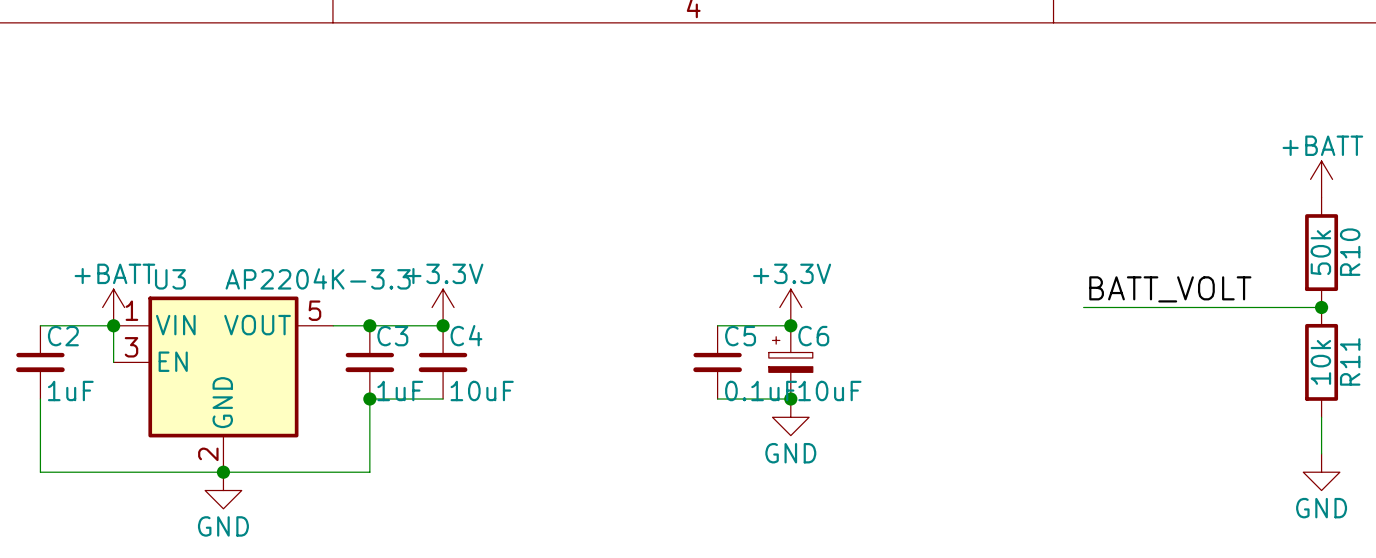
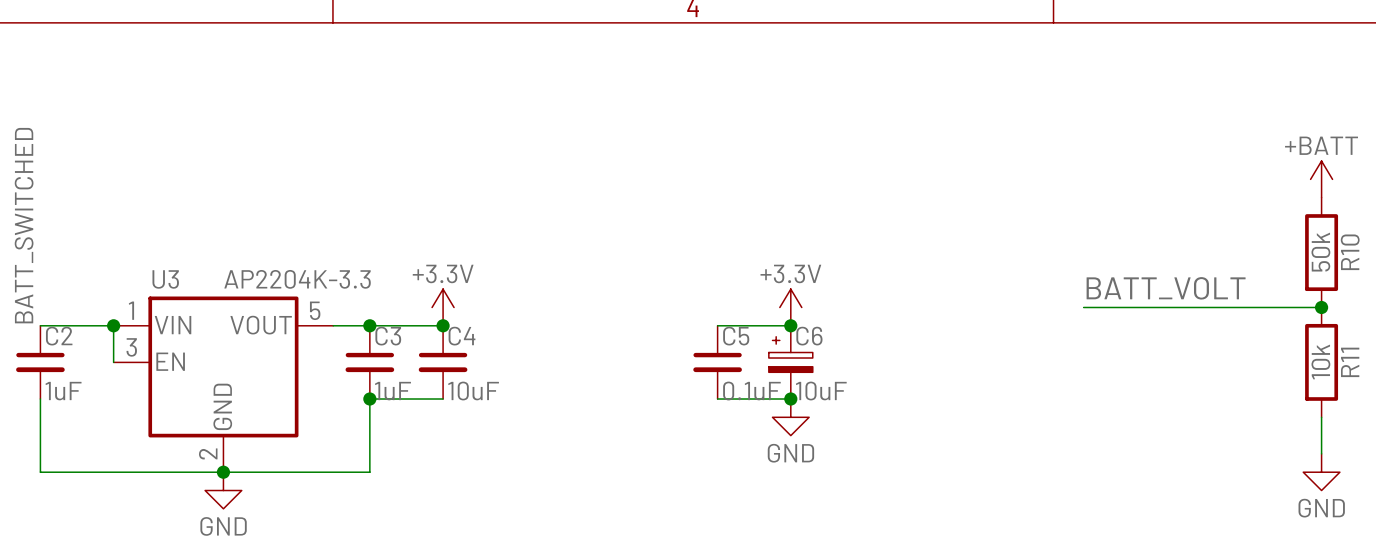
label: none -> BATT_SWITCHED (24, 225)
power symbol: +BATT (113, 307) -> none

